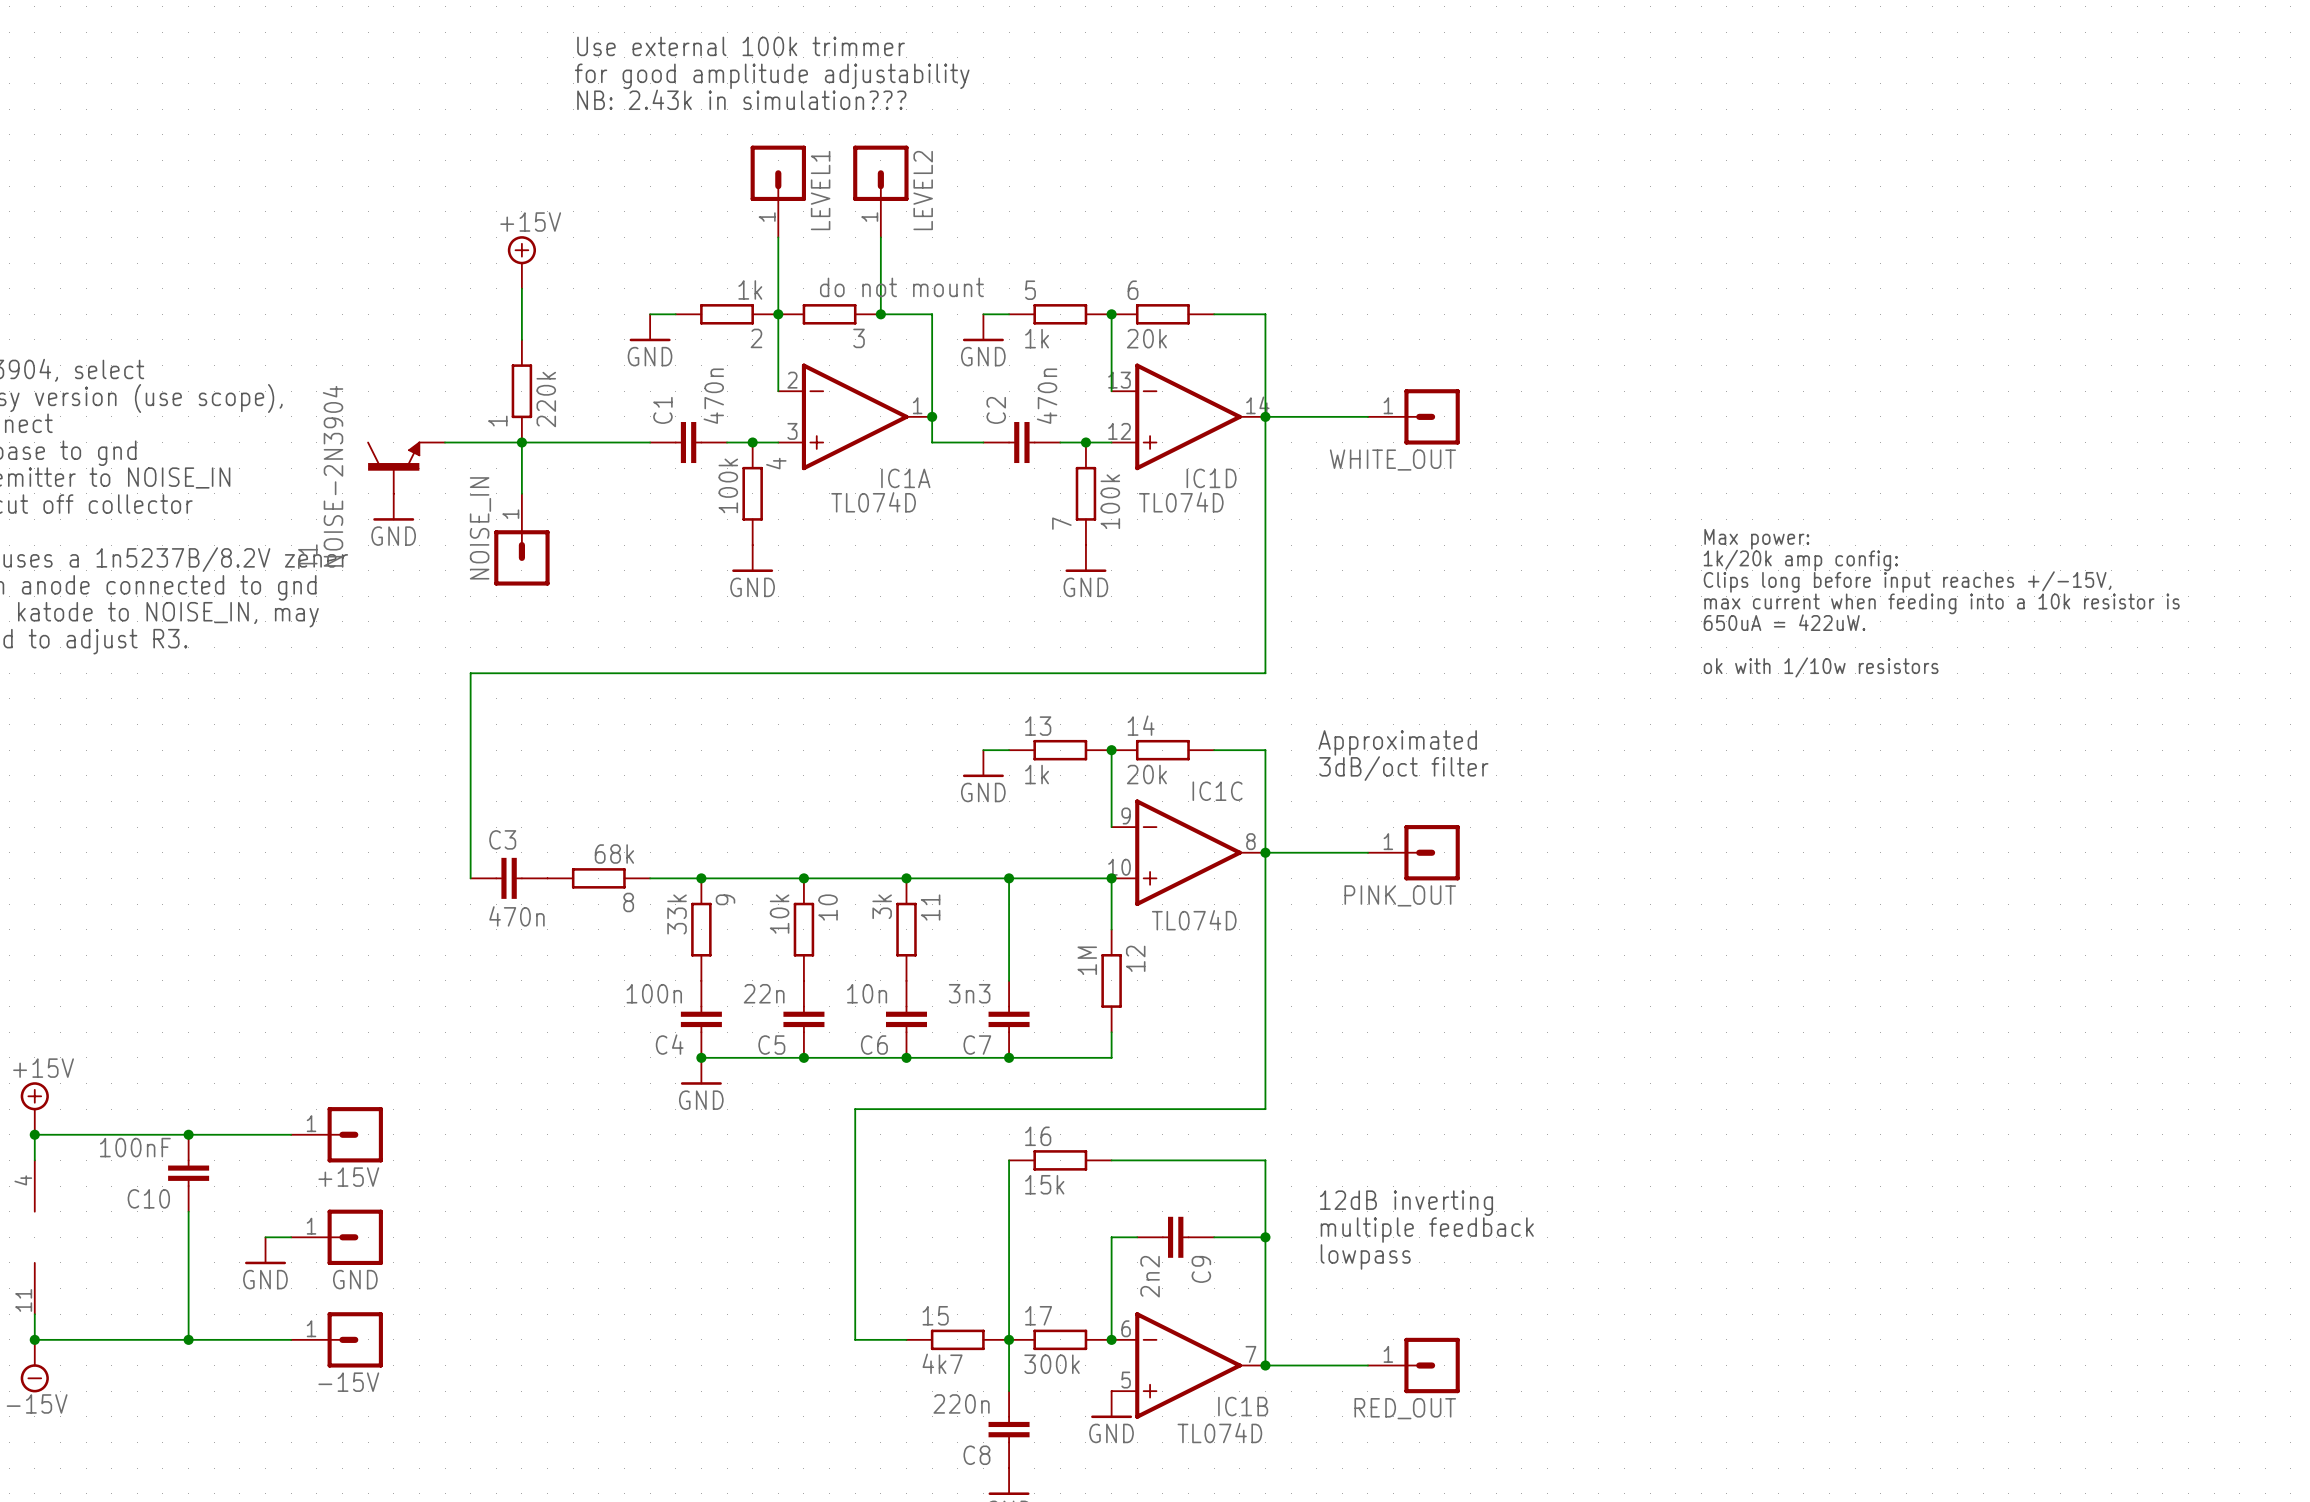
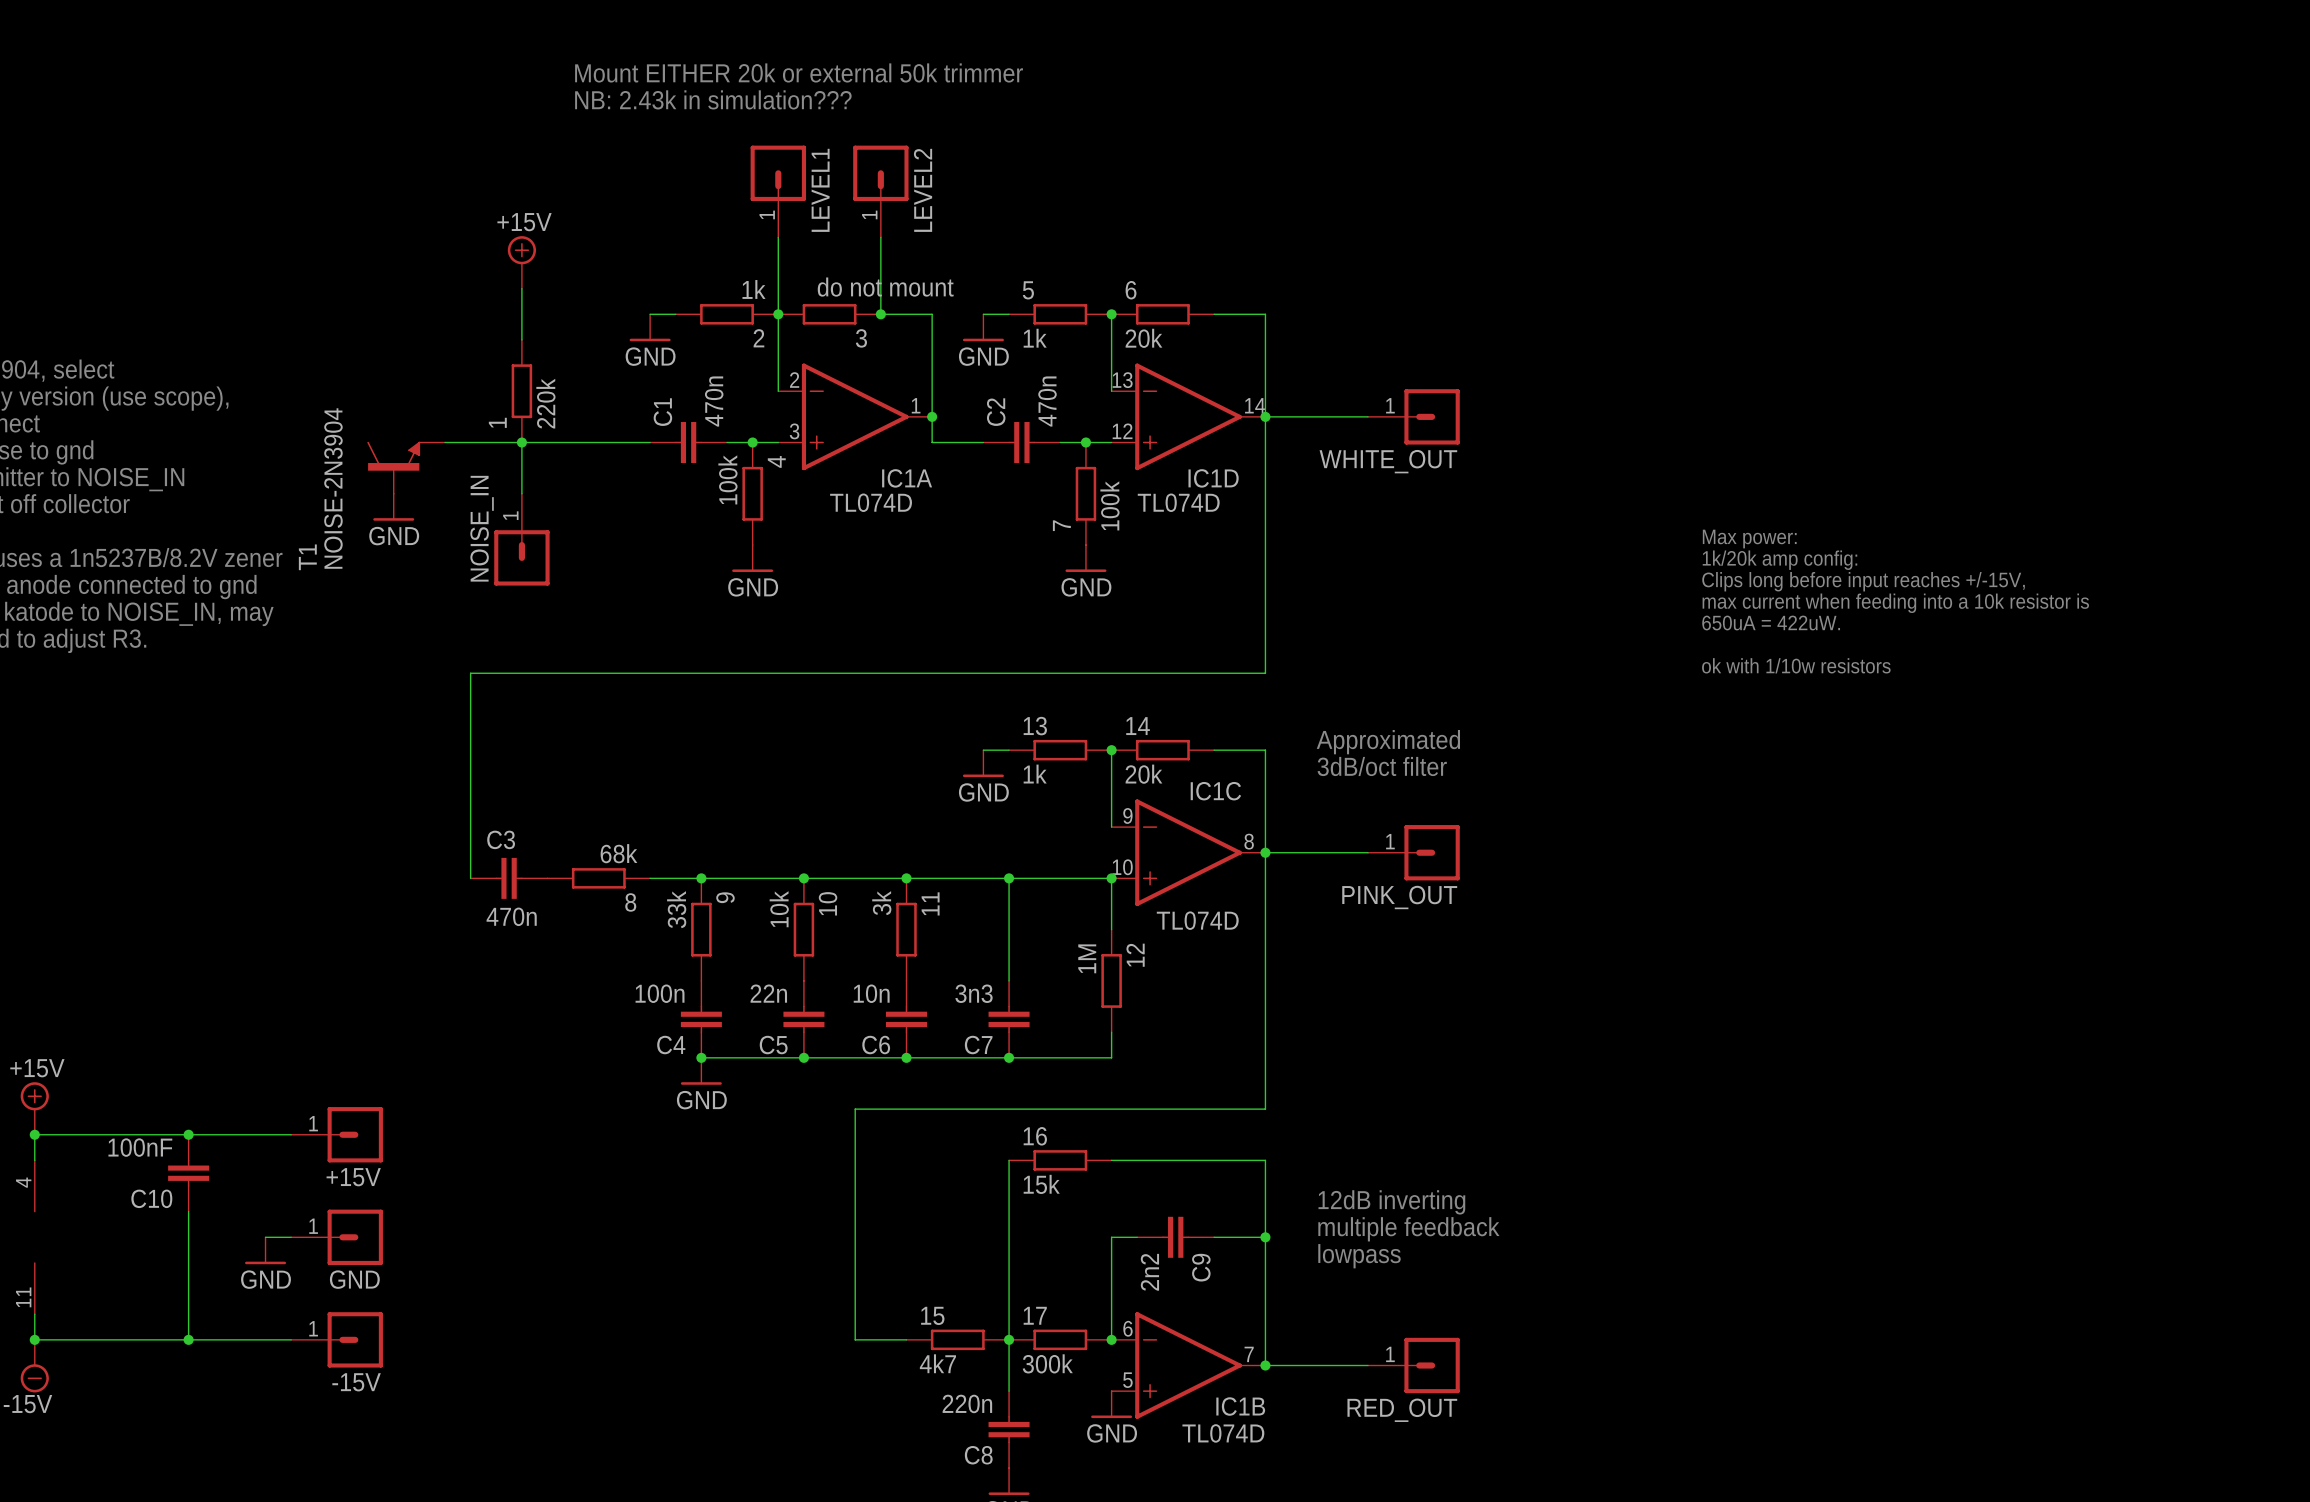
text: Use external 100k trimmer (741, 46) -> none
text: for good amplitude adjustability (772, 76) -> Mount EITHER 20k or external 50k trimmer (799, 72)

